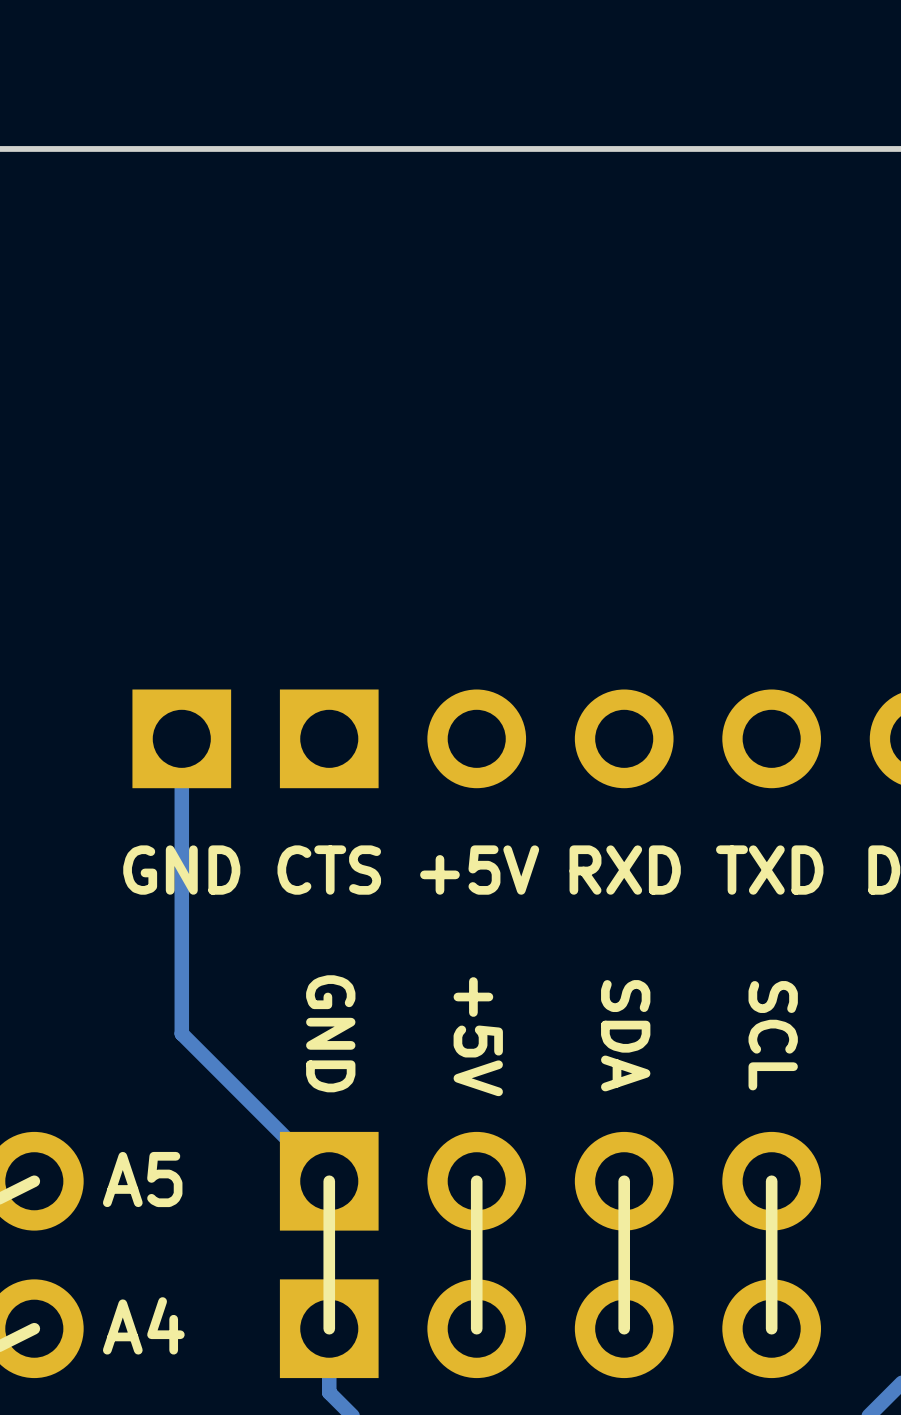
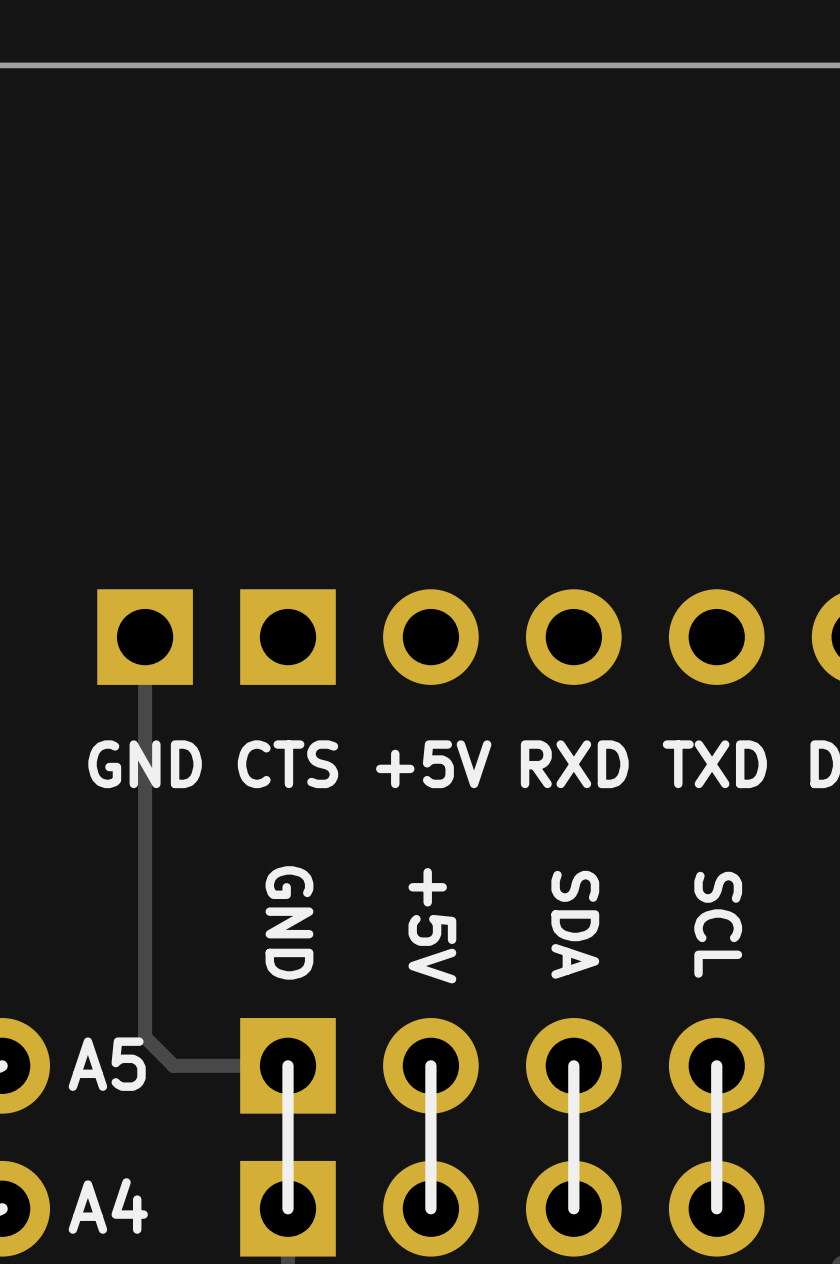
track: (181, 1033) (329, 1181) -> (145, 922) (145, 1037) (173, 1065) (287, 1065)

